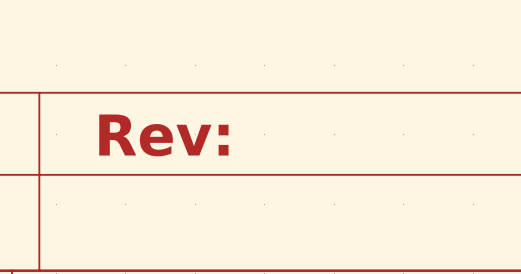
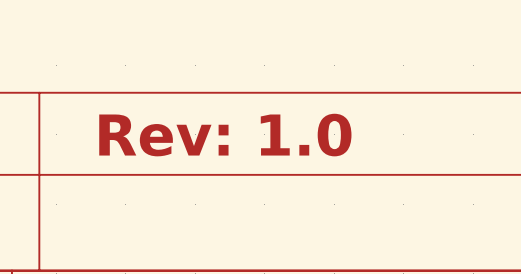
title block: Rev: (163, 135) -> Rev: 1.0 (225, 135)

